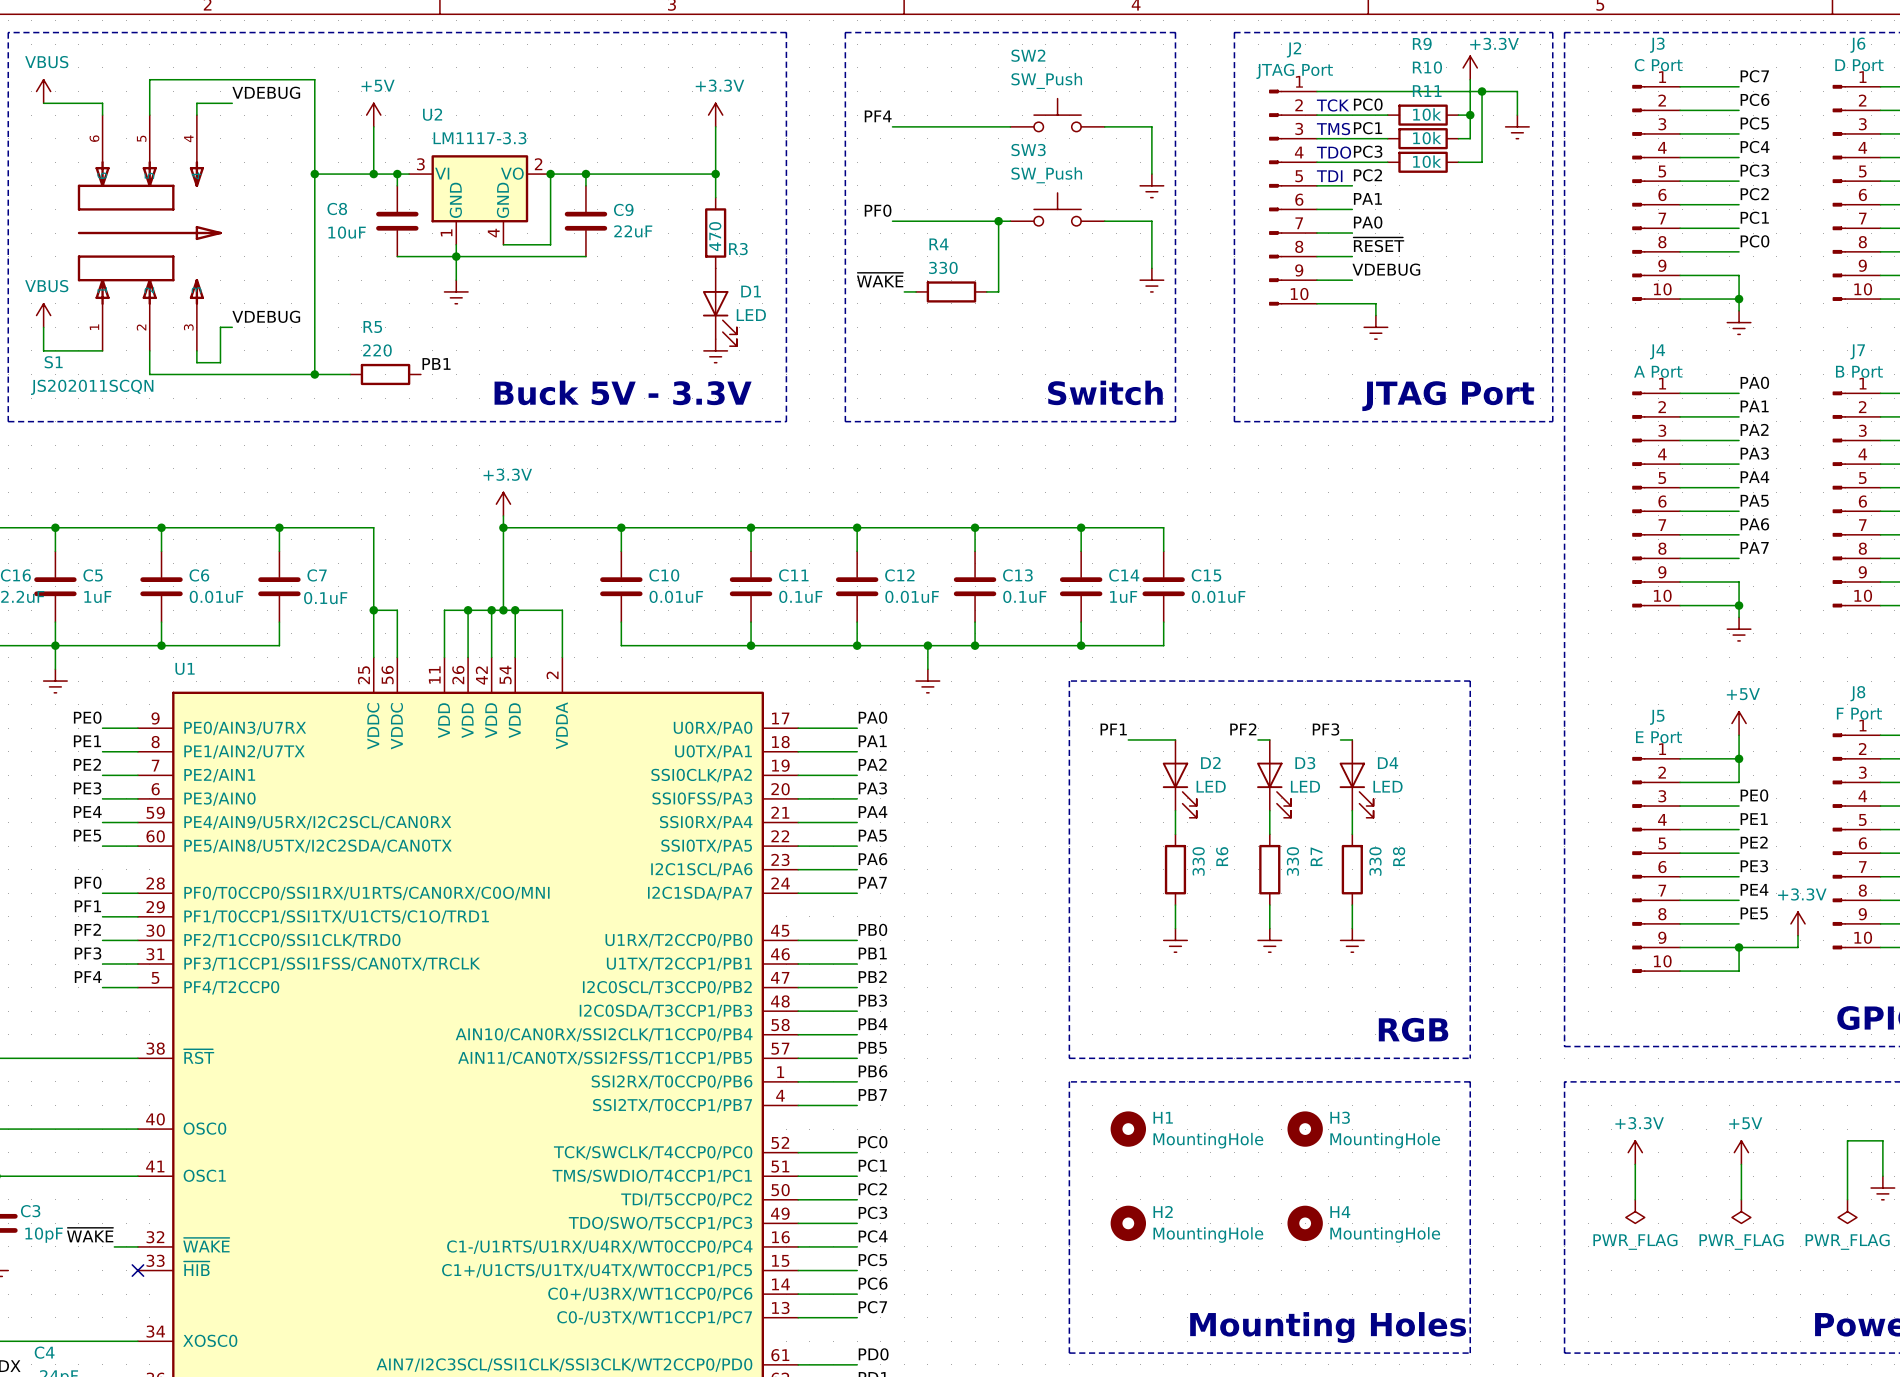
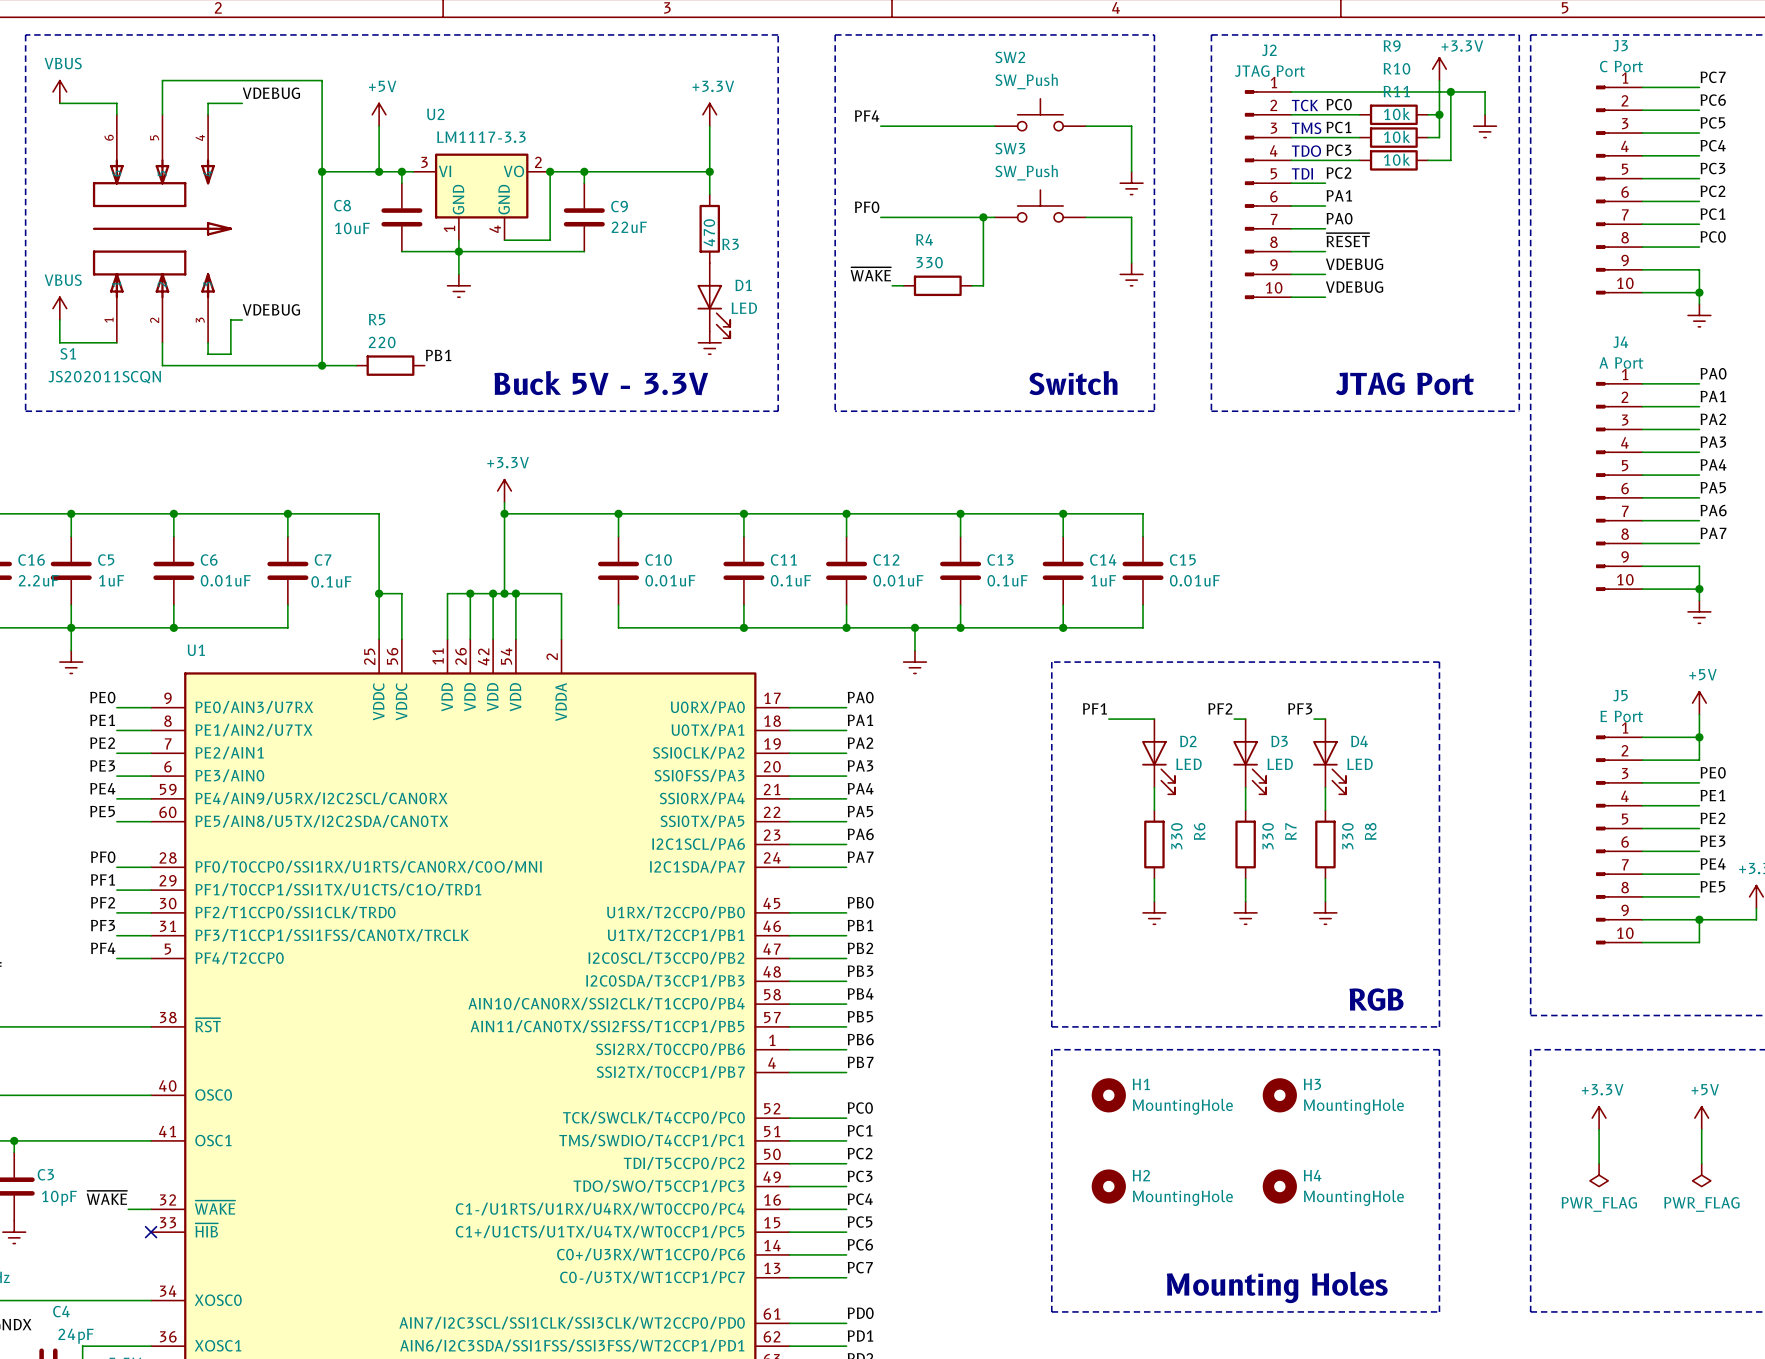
label: none -> VDEBUG (1354, 287)
wire: (1352, 303) (1375, 303) (1375, 315) -> none
power symbol: (1375, 327) -> none

